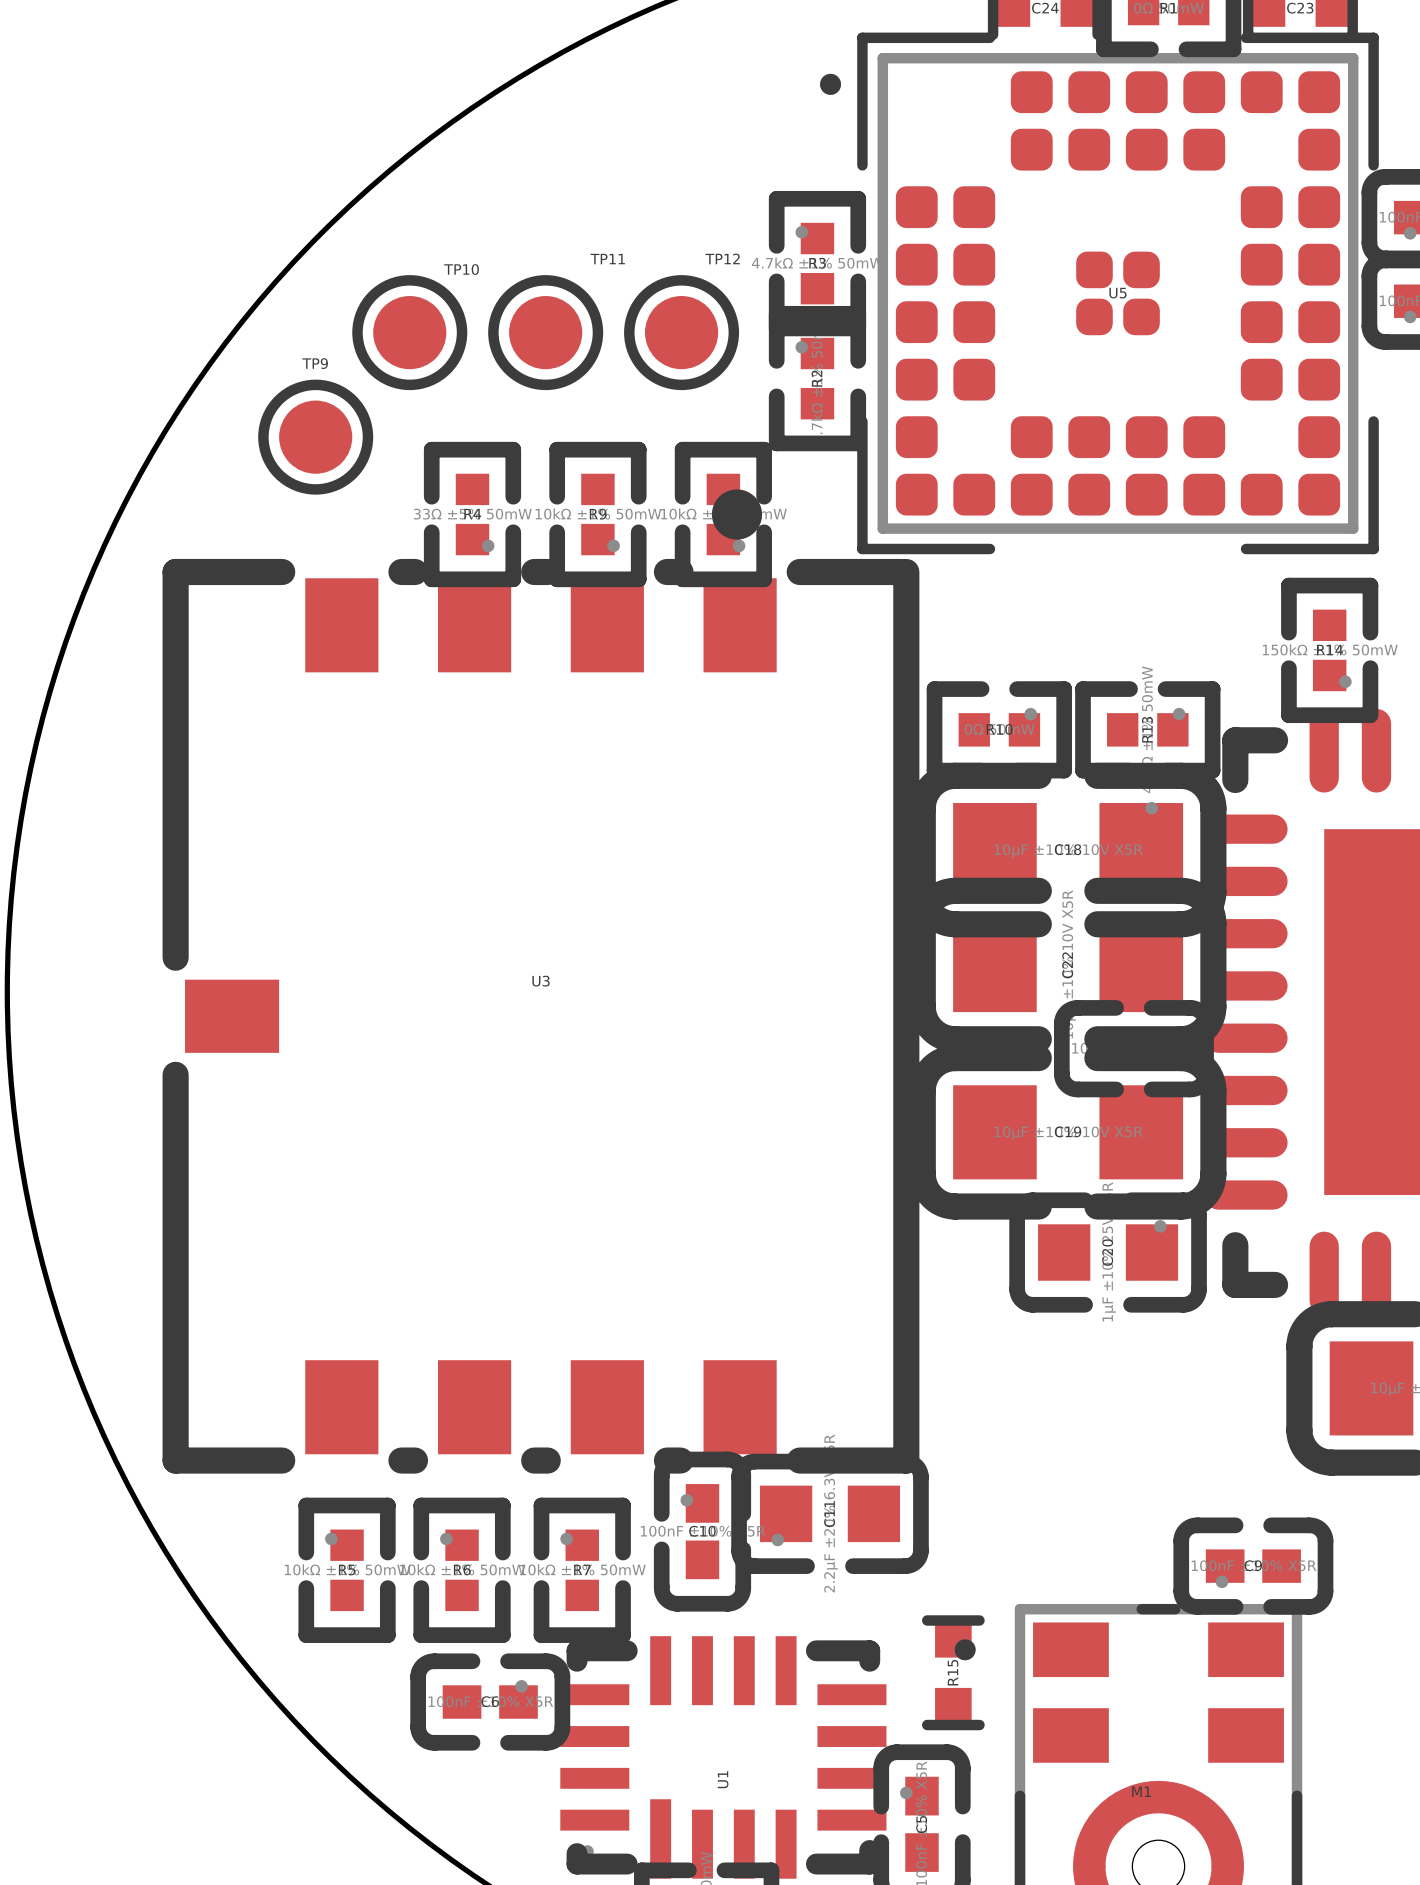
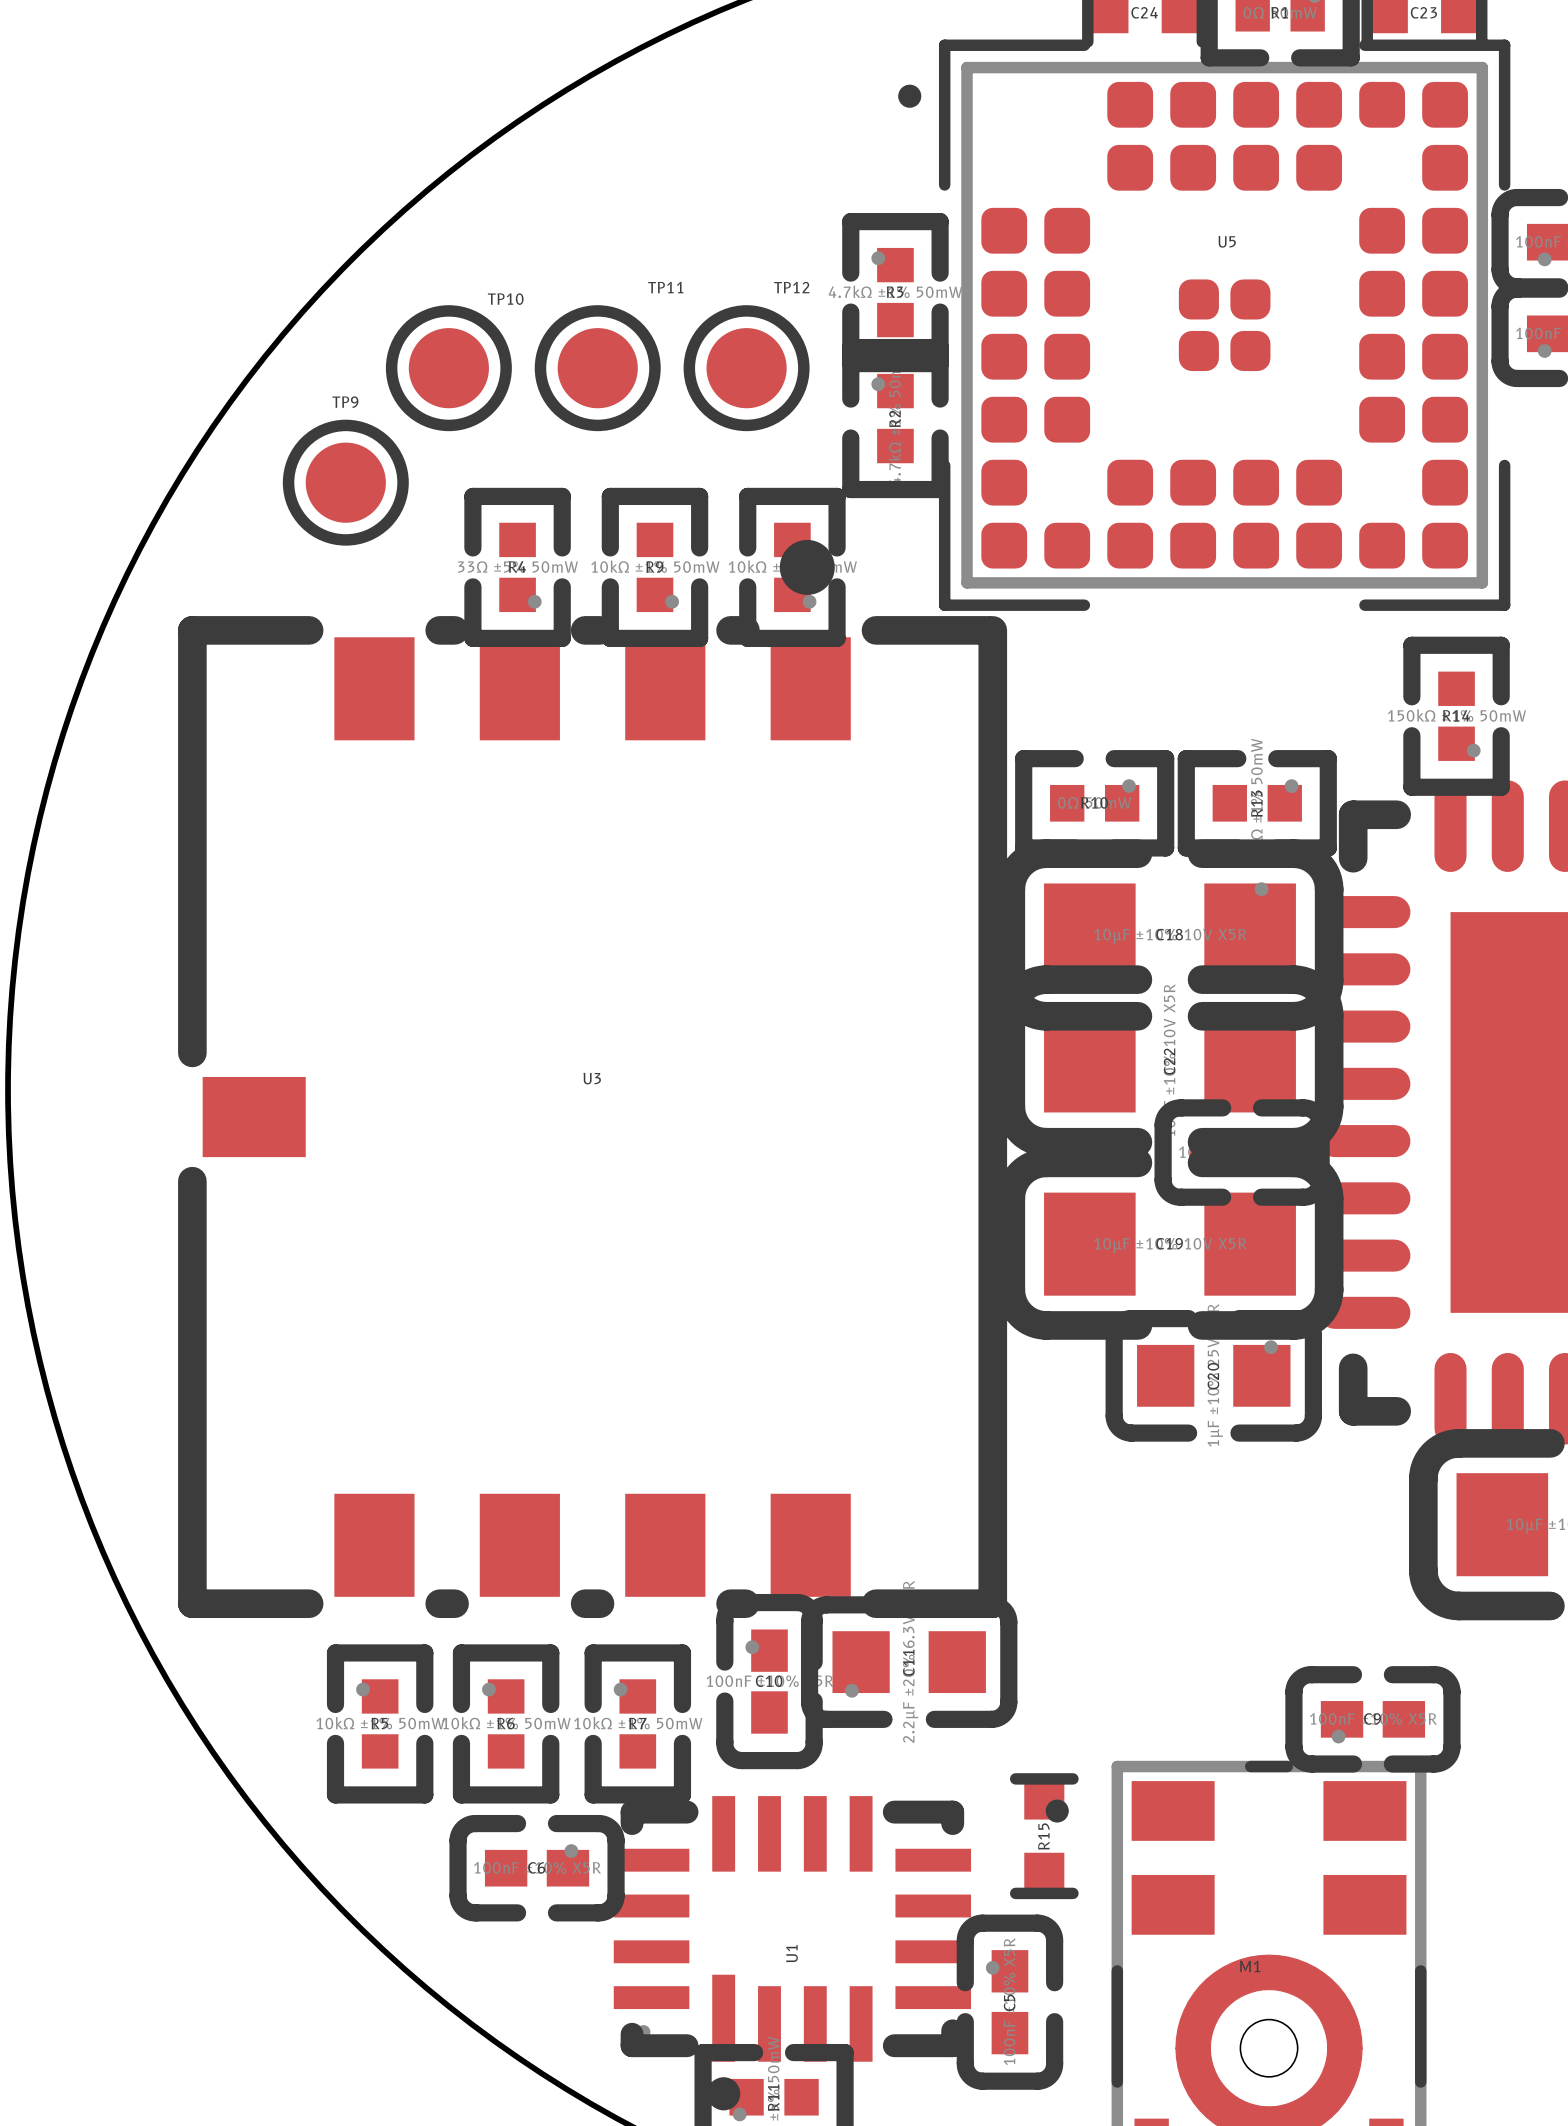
U5 name position: U5 (1118, 293) -> U5 (1227, 241)

